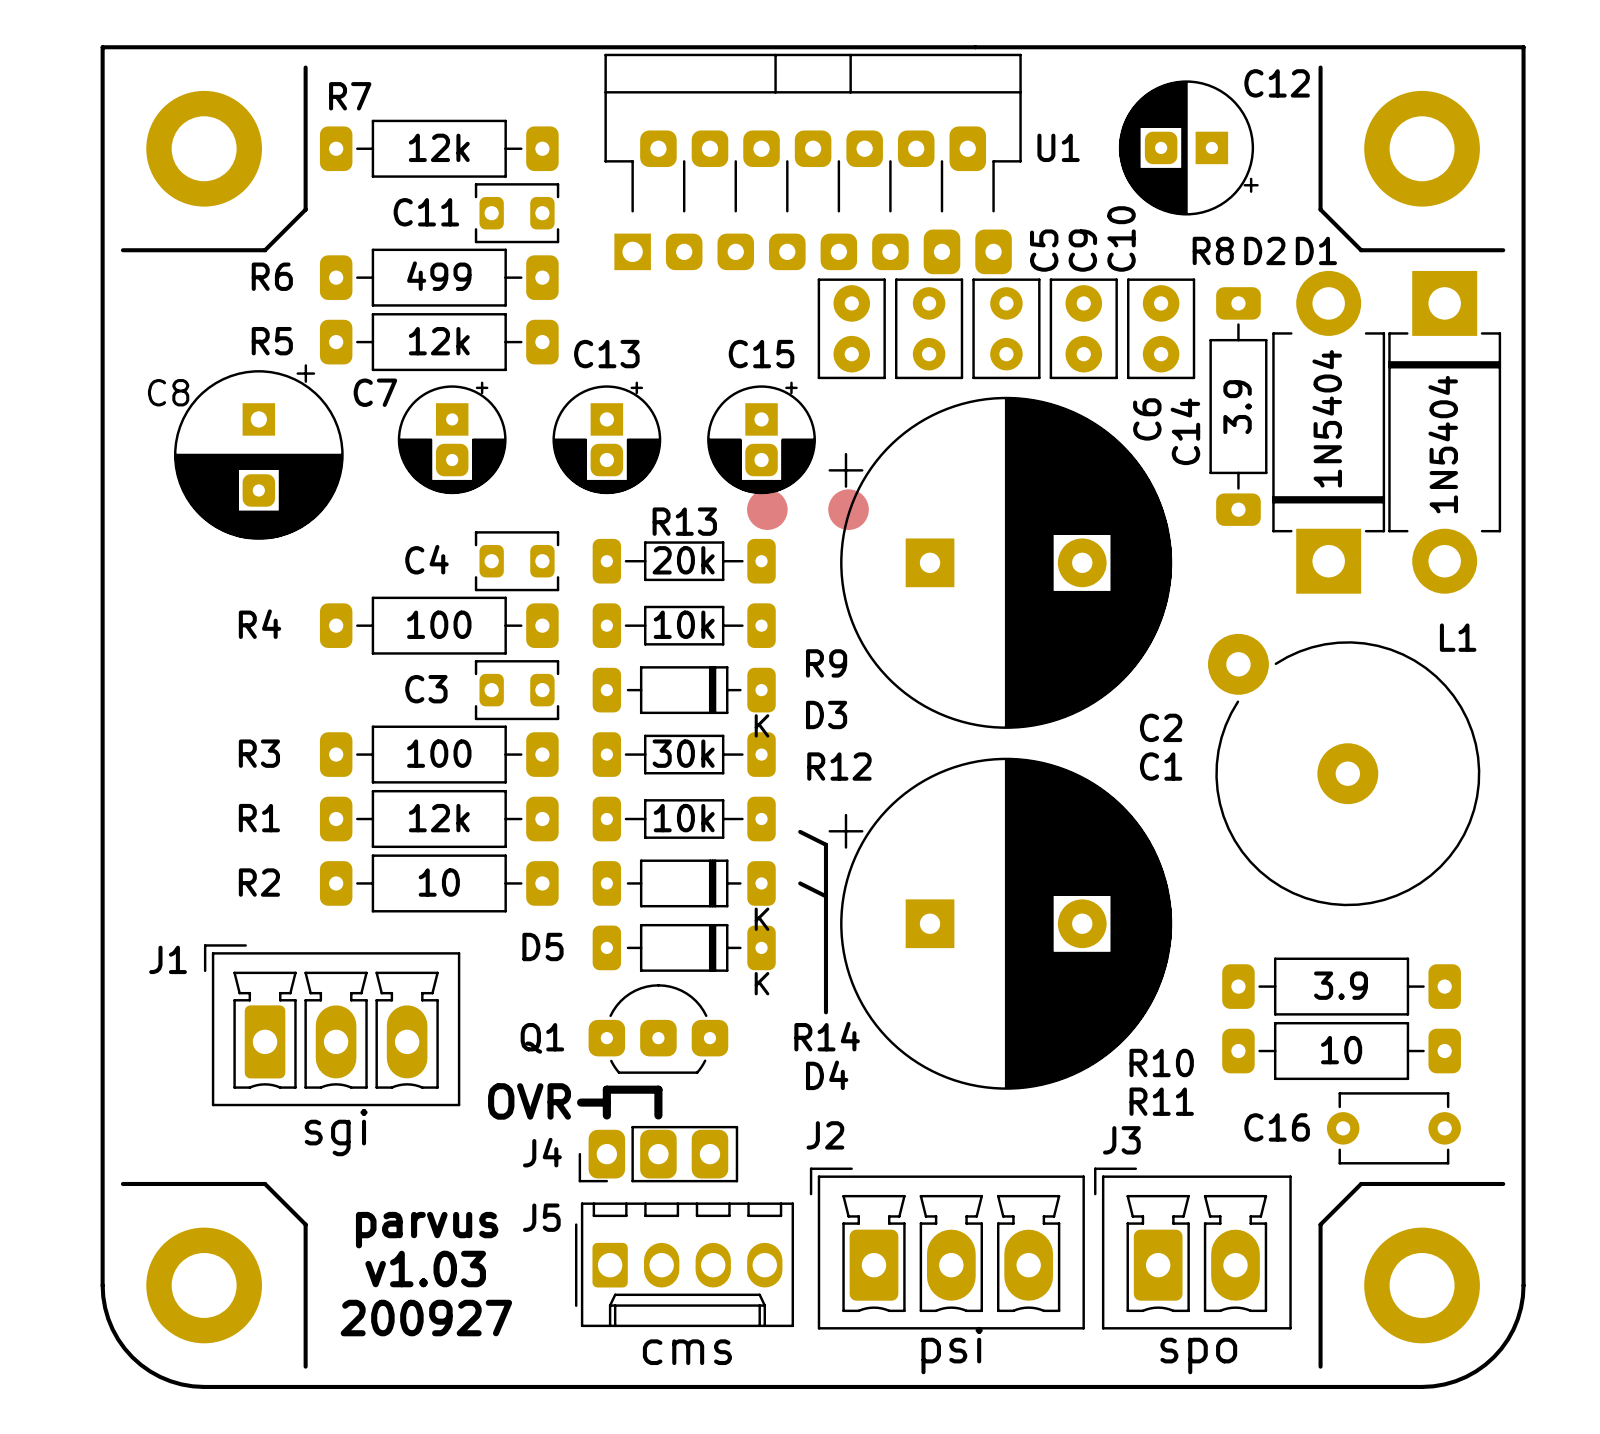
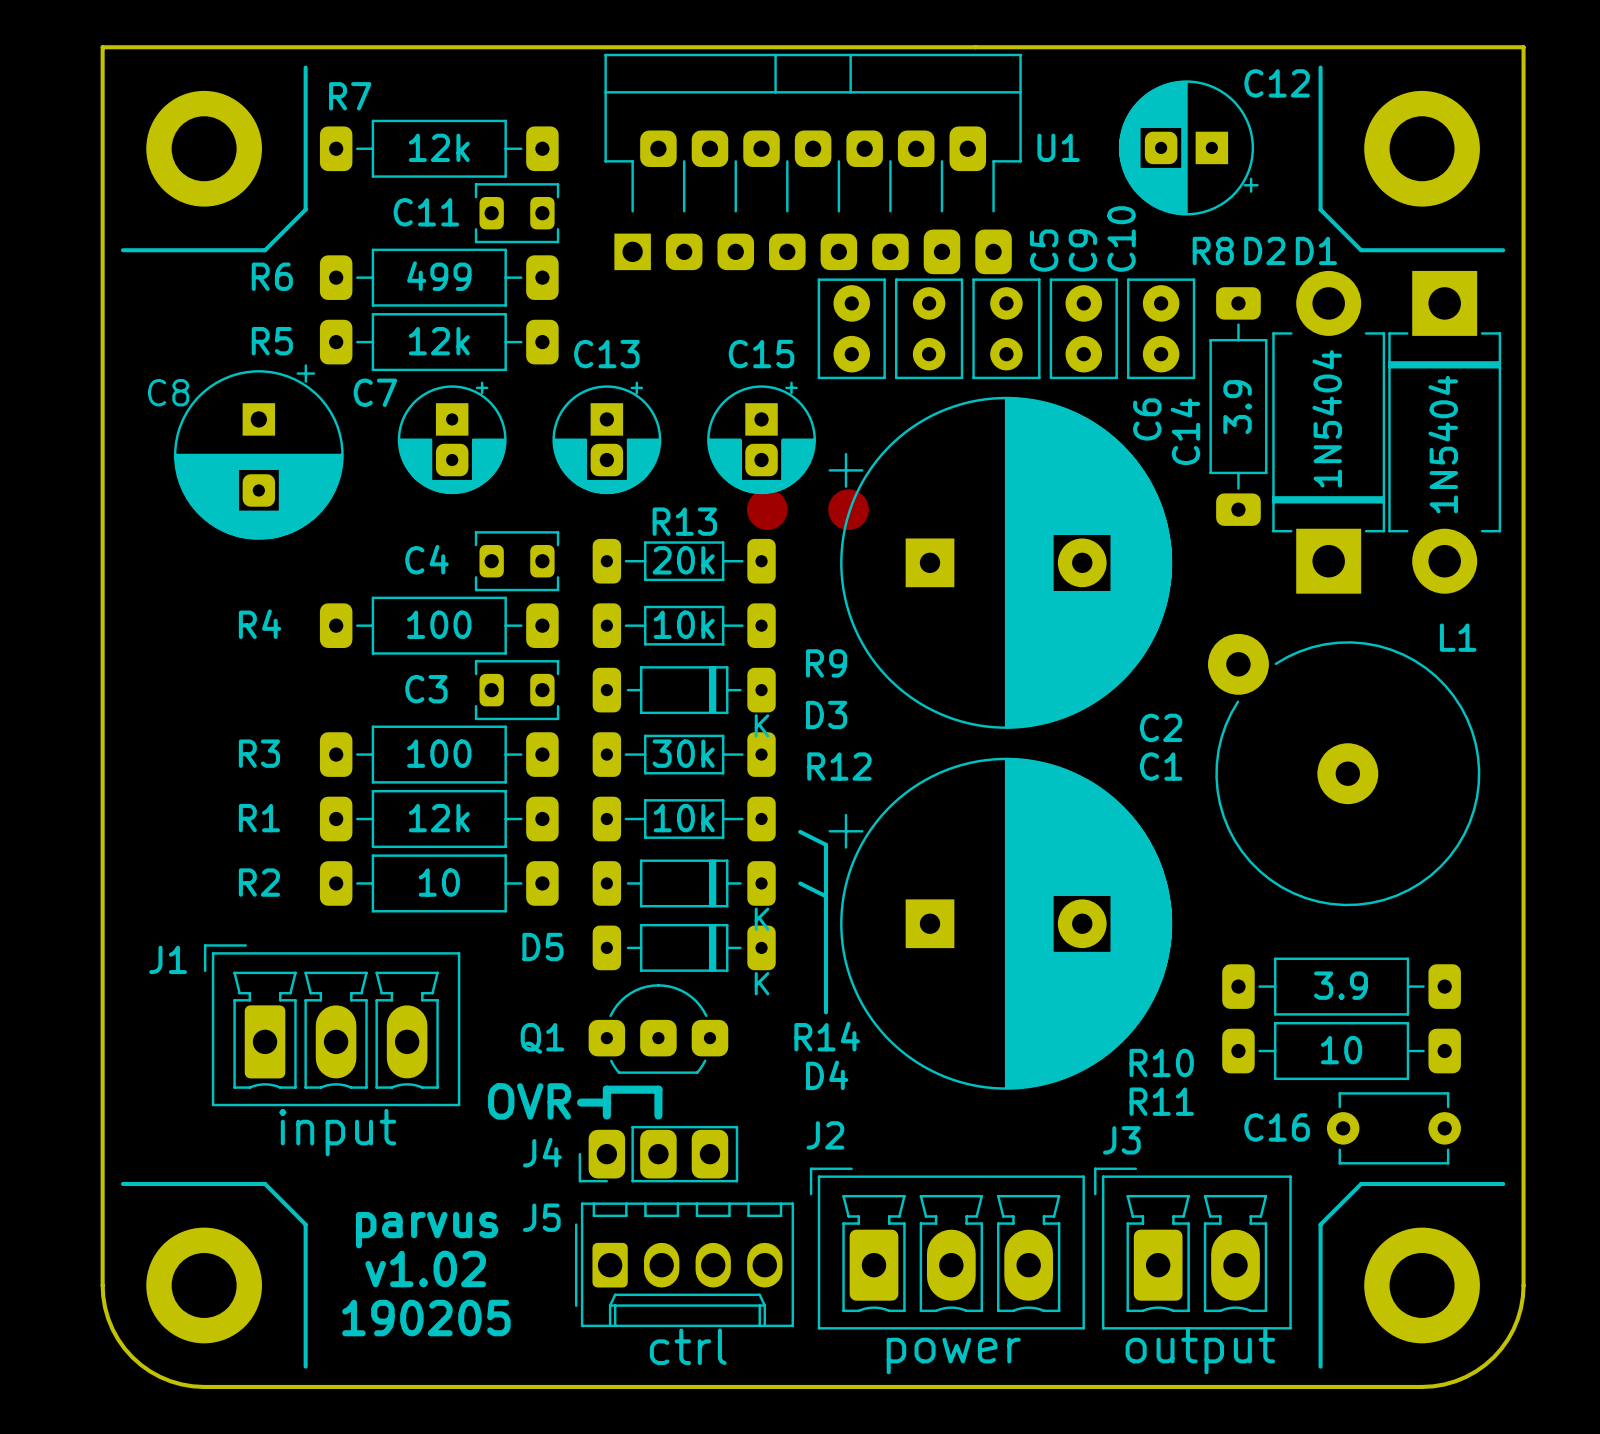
J1 value: sgi (336, 1132) -> input (337, 1132)
text: v1.03 (425, 1269) -> v1.02 (425, 1269)
text: 200927 (426, 1318) -> 190205 (426, 1318)
J2 value: psi (952, 1350) -> power (953, 1355)
J5 value: cms (687, 1352) -> ctrl (688, 1346)
J3 value: spo (1198, 1355) -> output (1200, 1350)

